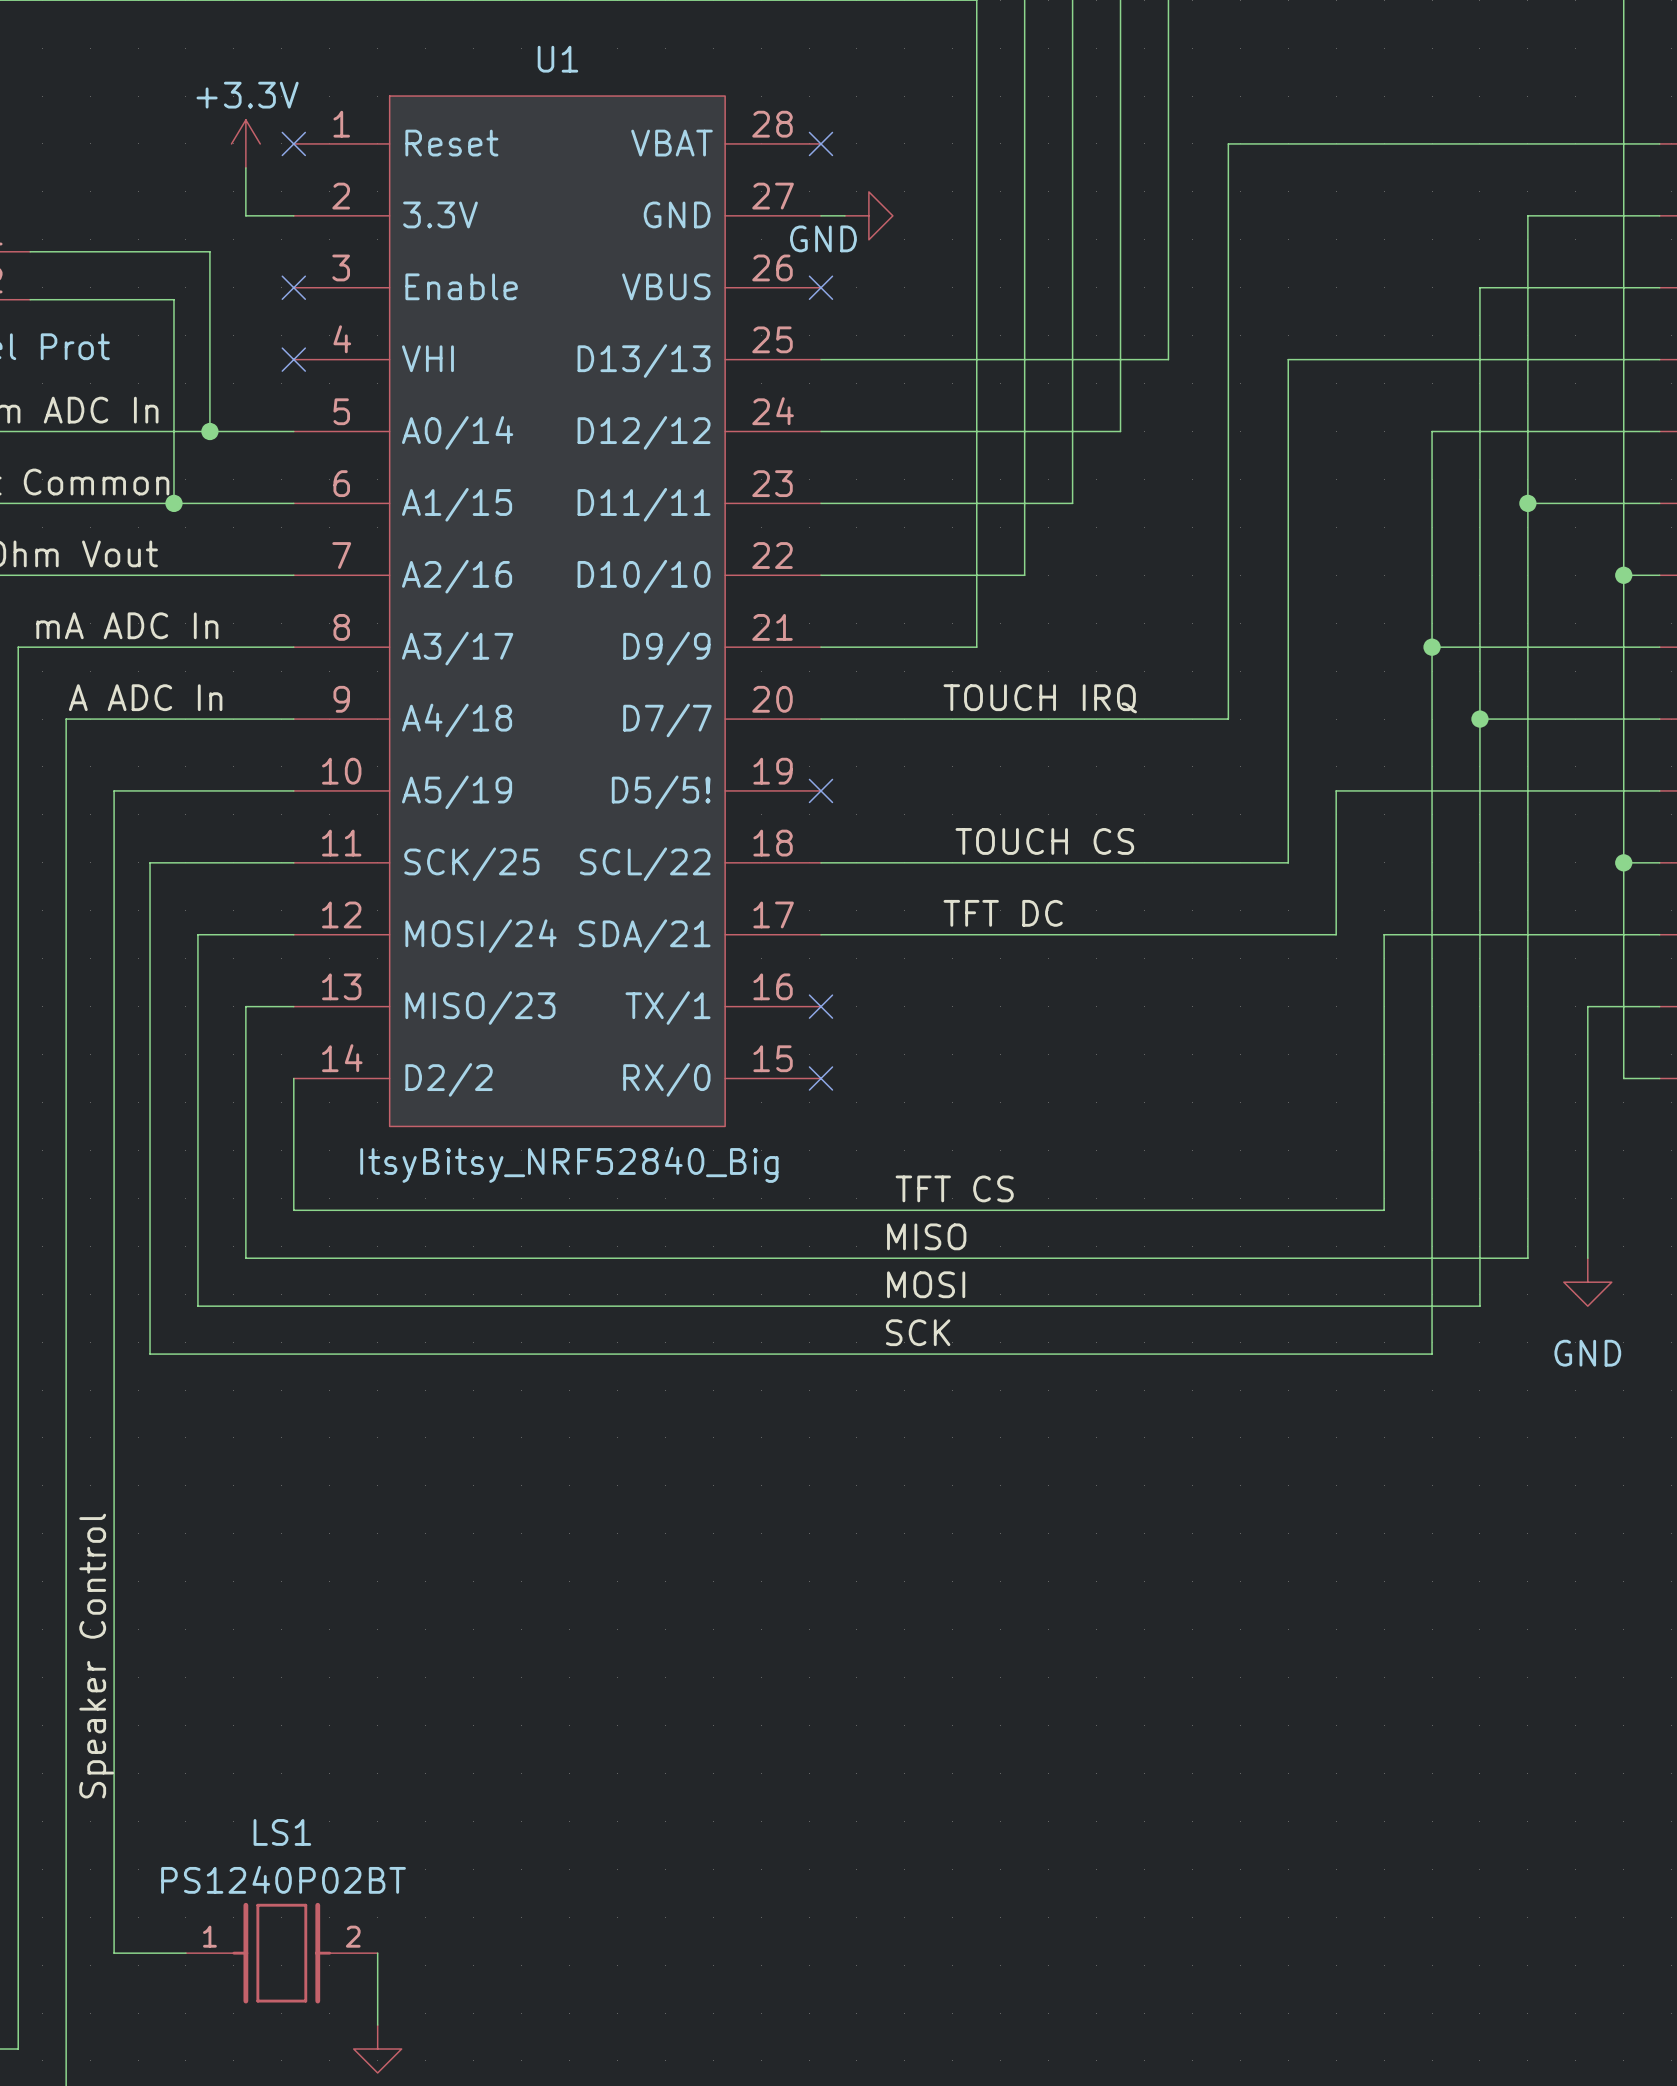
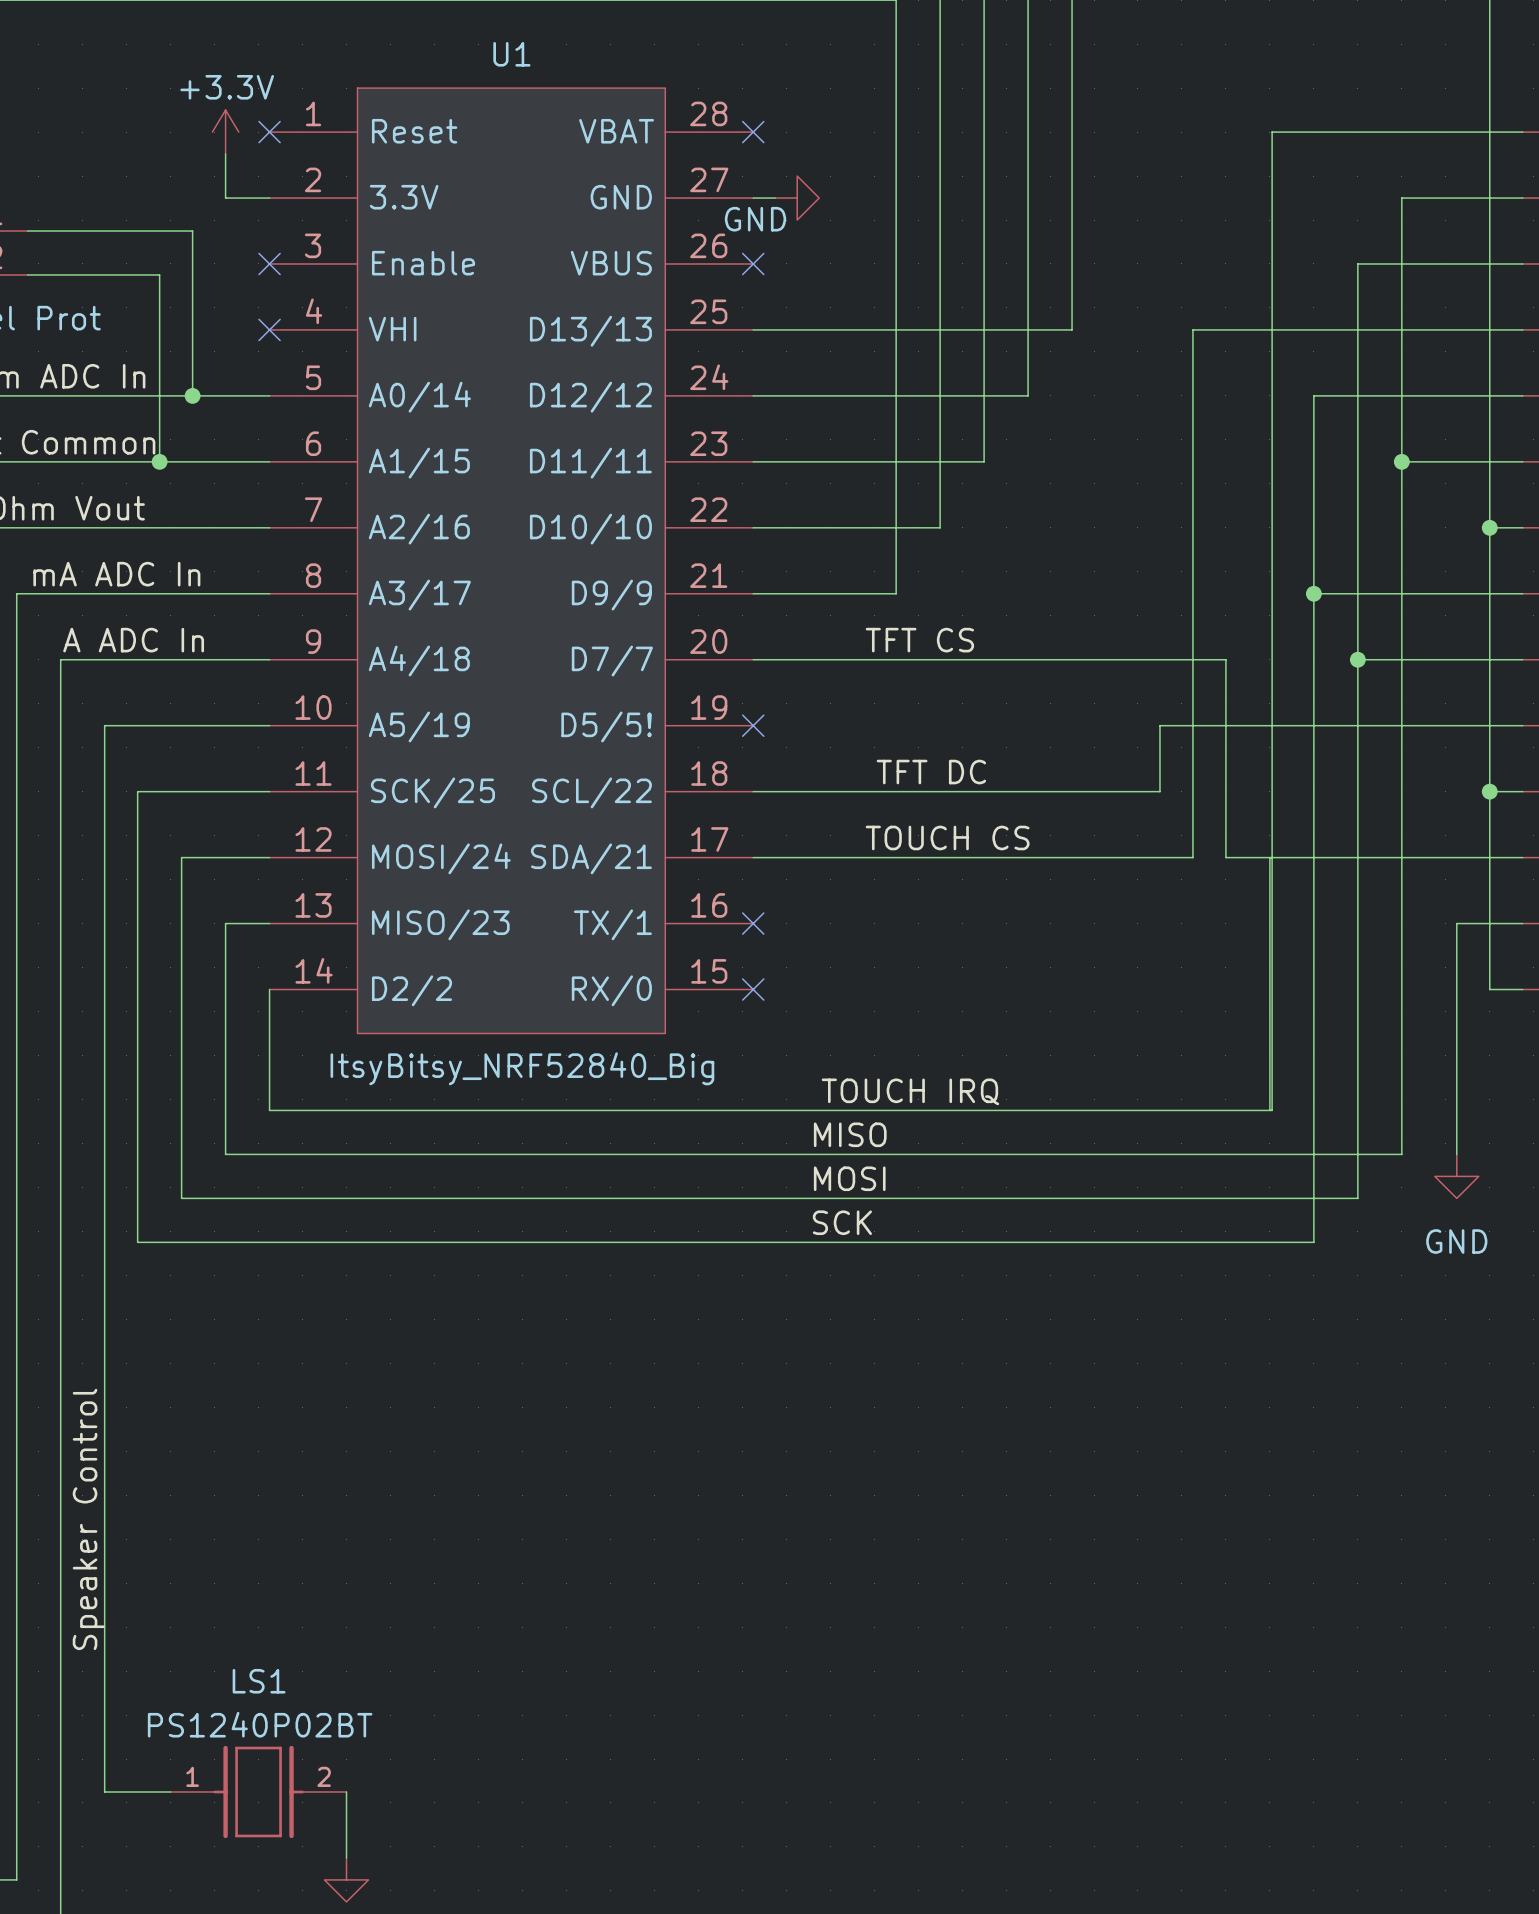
wire: (1386, 143) (1228, 143) (1228, 719) -> (1272, 132) (1272, 1110) (1269, 1110)
wire: (1300, 359) (1288, 359) (1288, 862) (1264, 862) -> (1192, 329) (1192, 857)
label: TOUCH IRQ (1040, 698) -> TFT CS (919, 640)
wire: none -> (1127, 659) (1225, 659) (1225, 725) (1159, 725) (1159, 791)
label: TOUCH CS (1044, 841) -> TFT DC (931, 772)
label: TFT DC (1003, 913) -> TOUCH CS (947, 837)
wire: (1300, 934) (1336, 934) -> (1269, 857) (1225, 857)
label: TFT CS (954, 1188) -> TOUCH IRQ (910, 1091)

